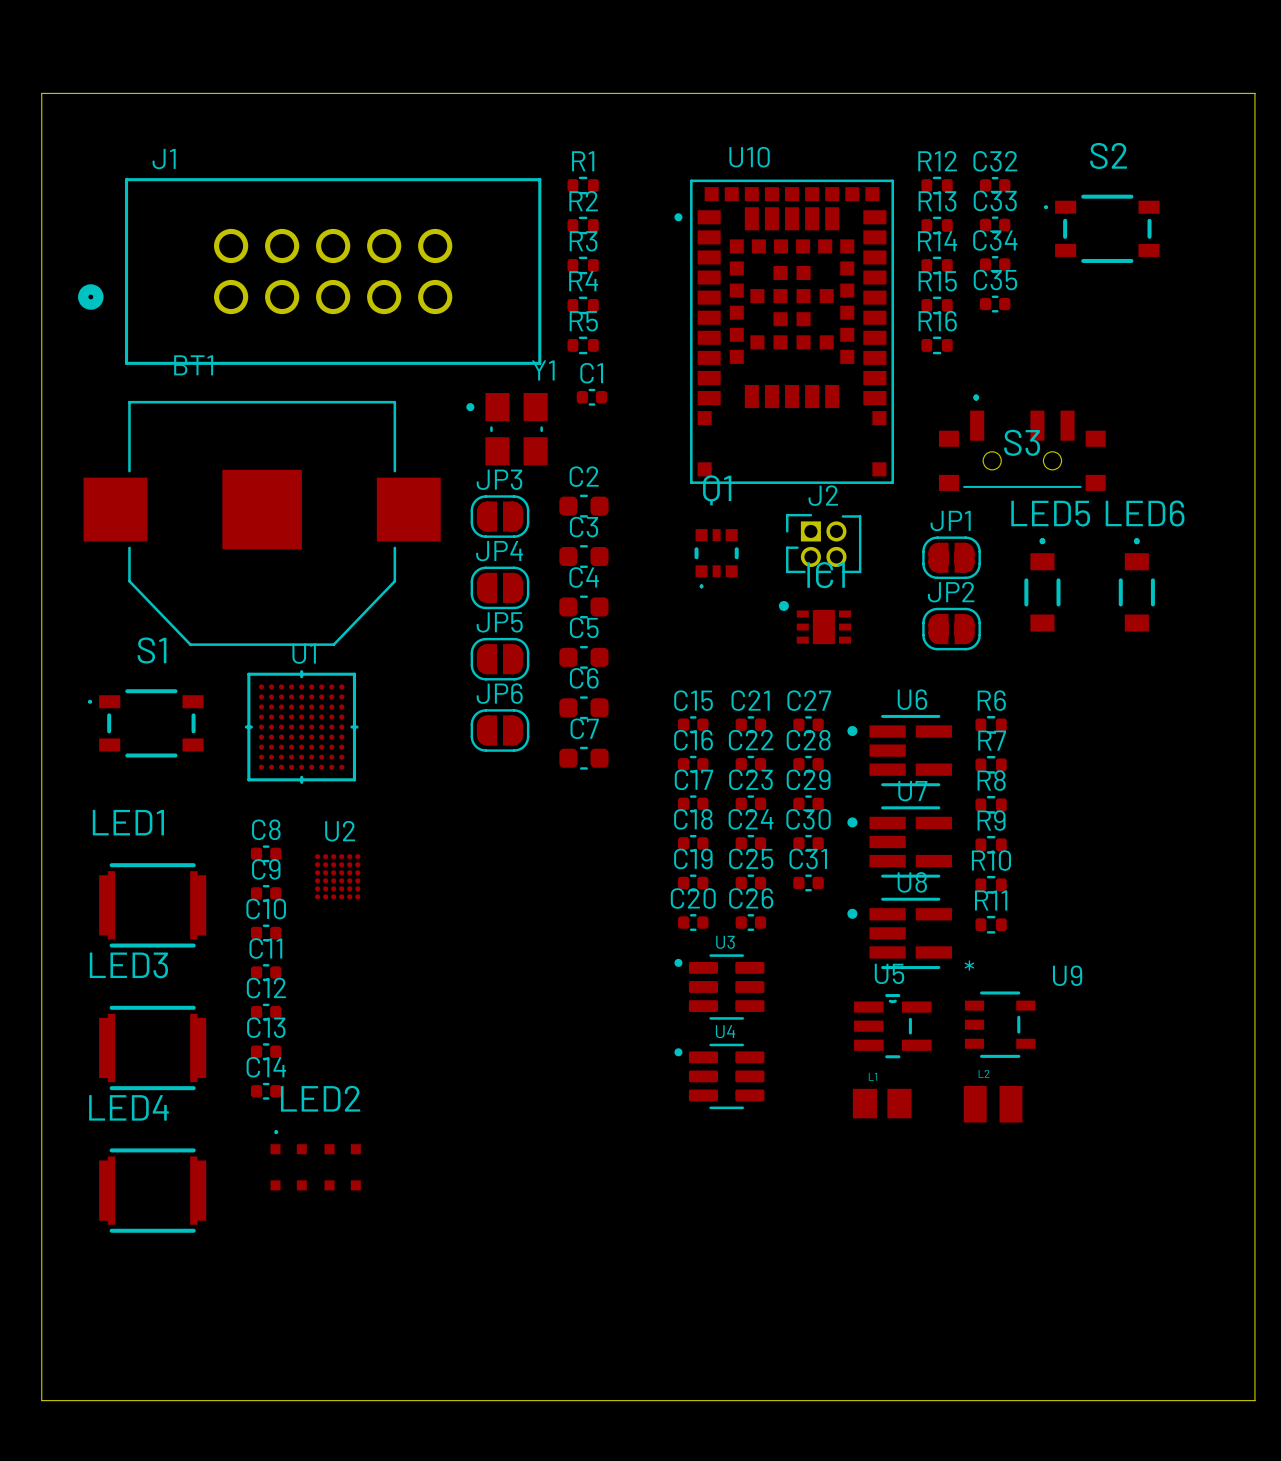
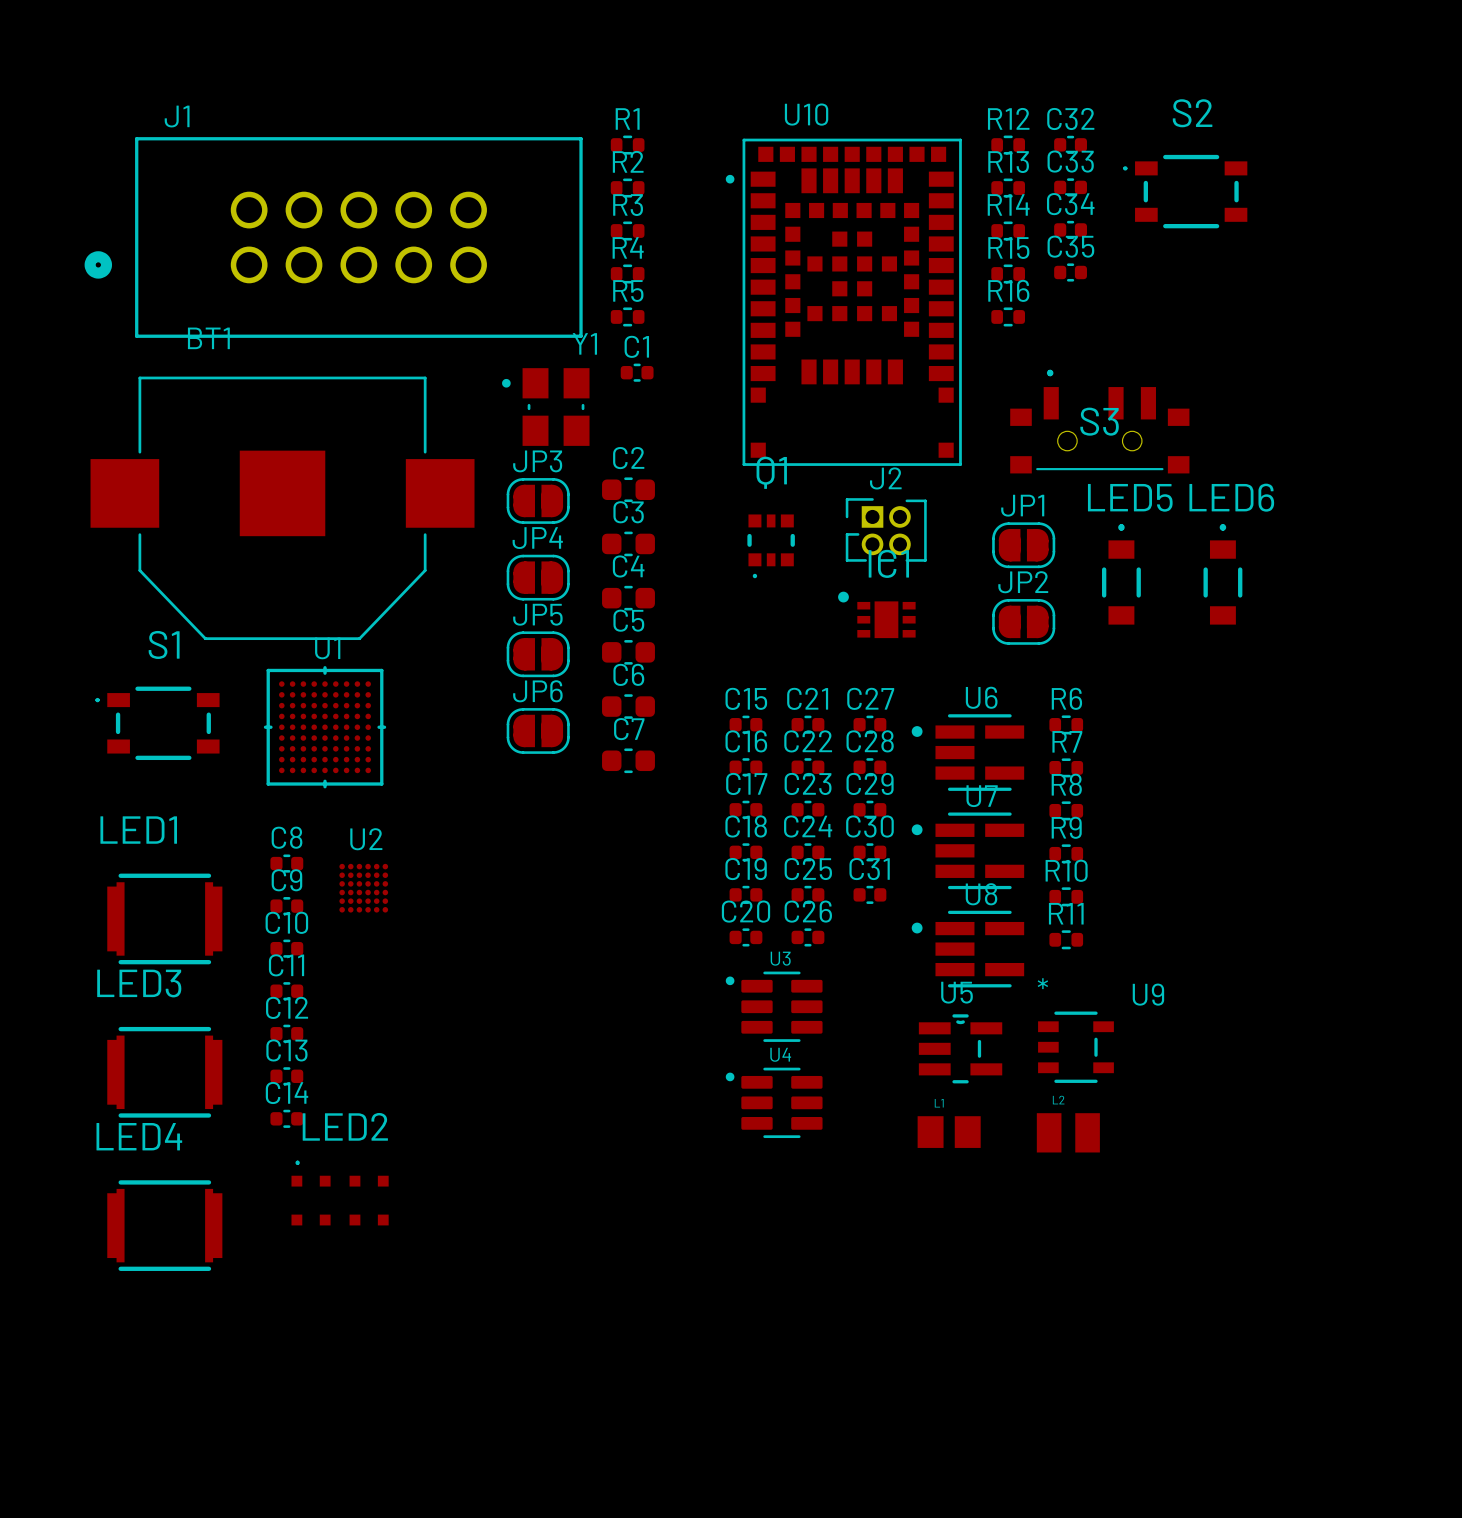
board edge: (41, 93) (1254, 93) (1254, 1400) (41, 1400) (41, 93) -> none

